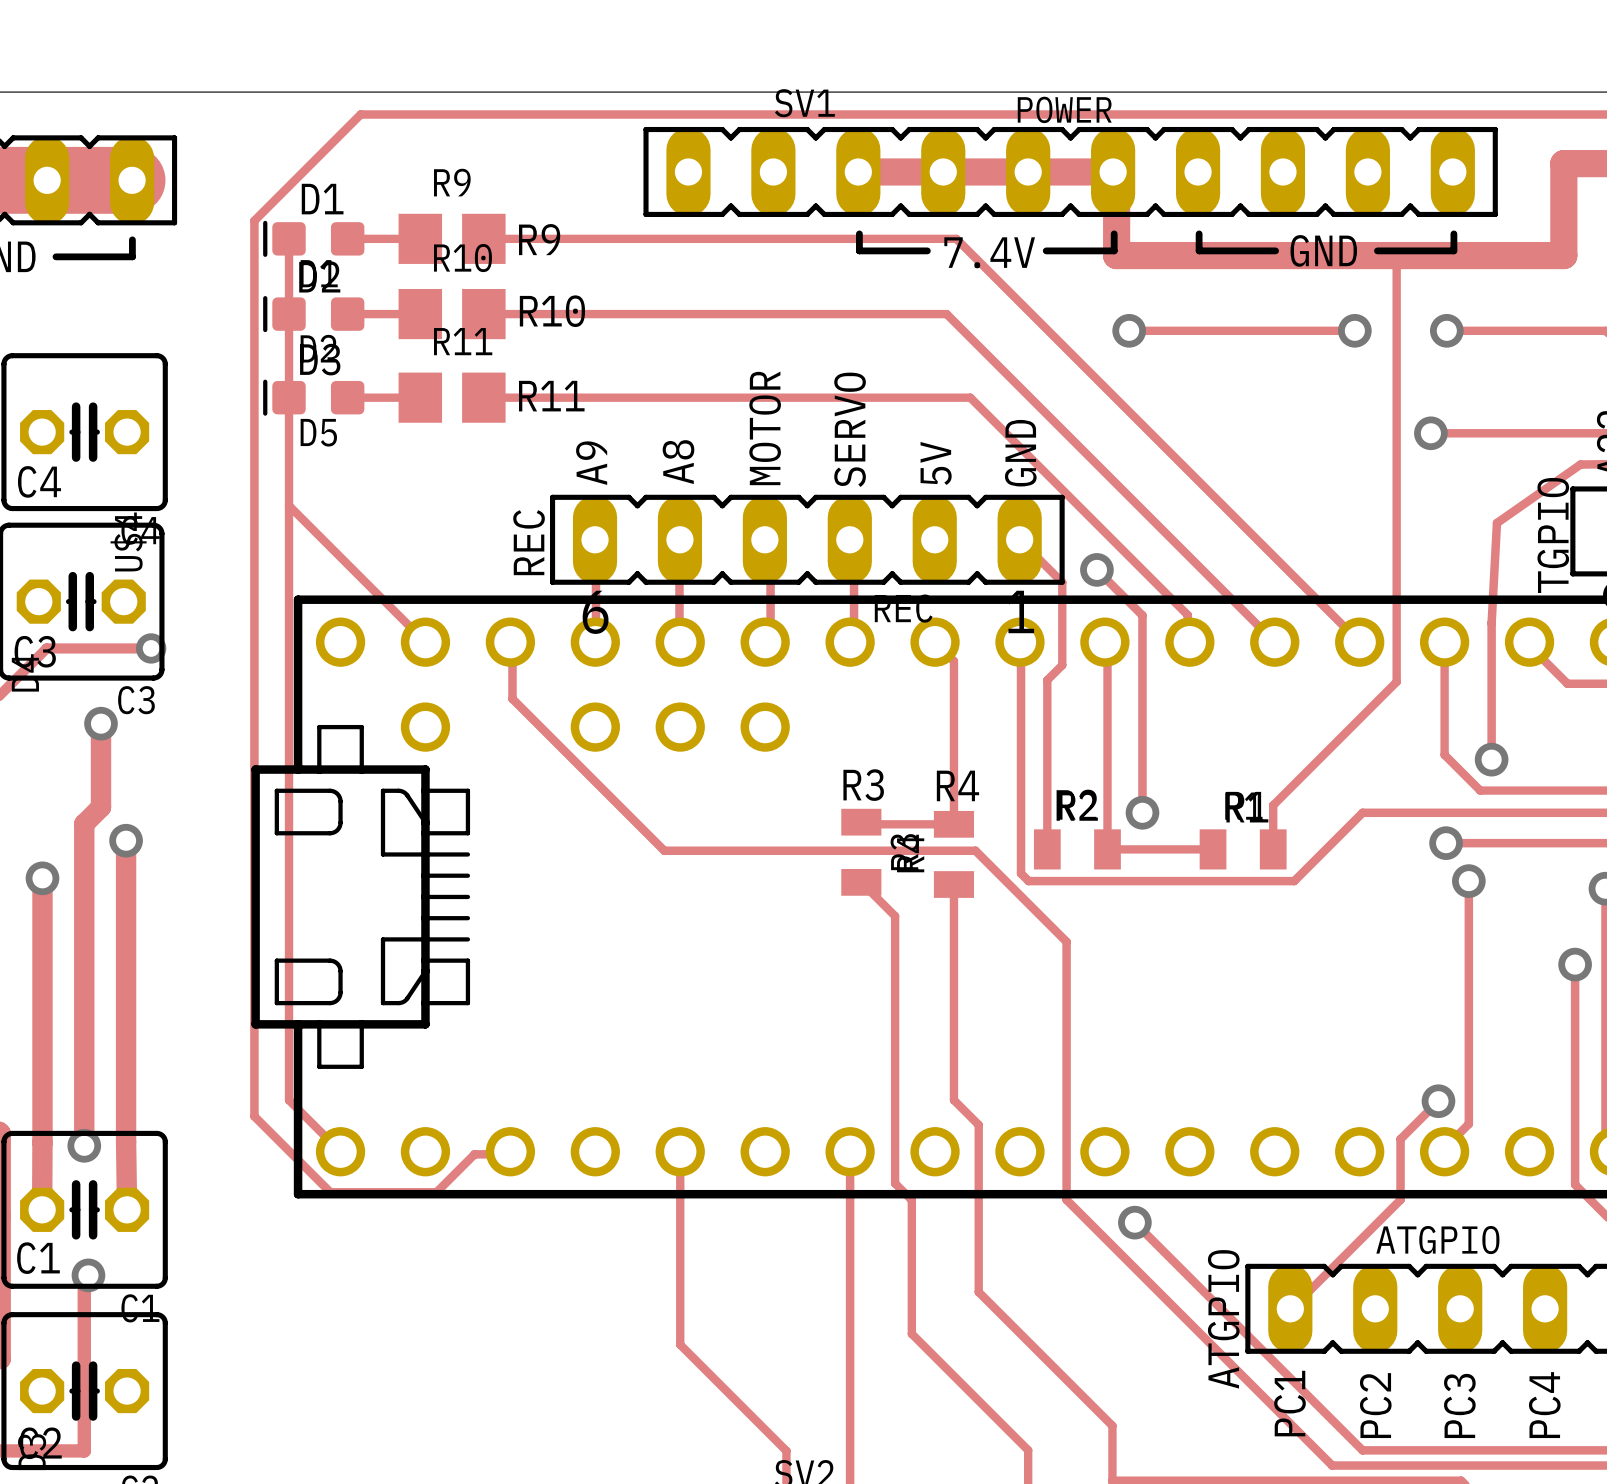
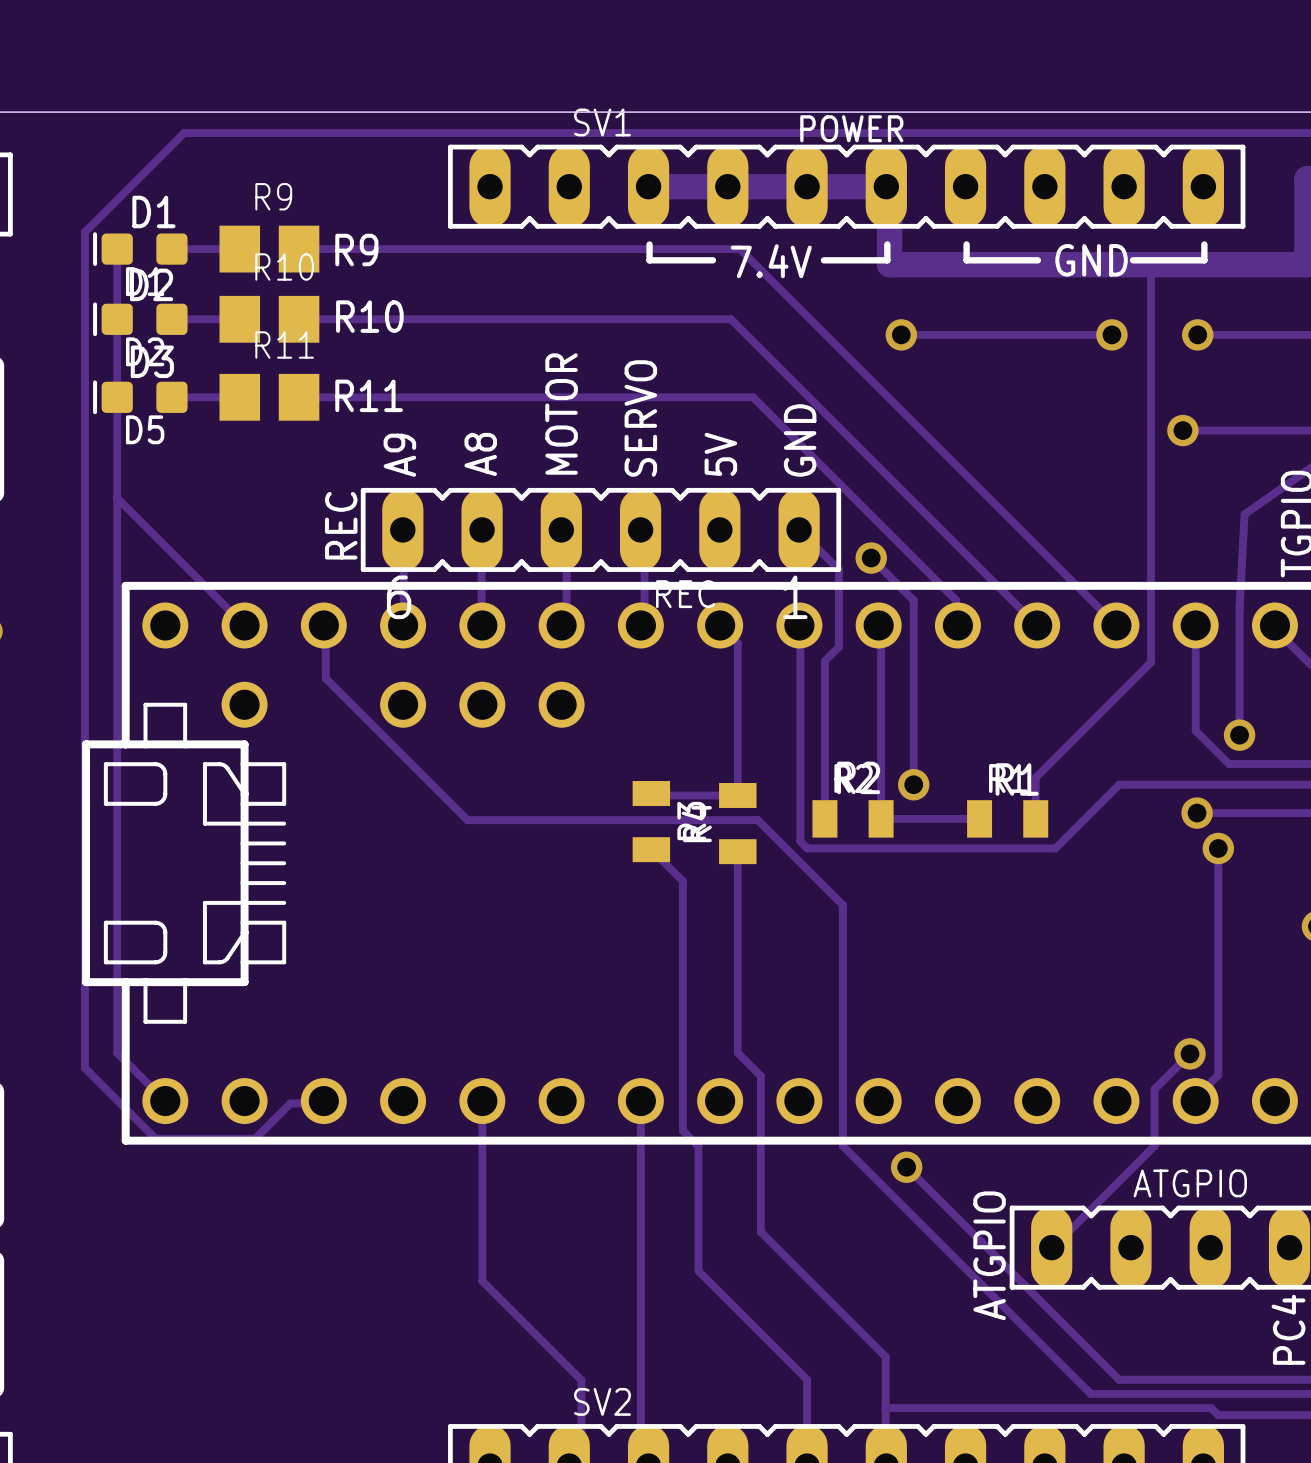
text: R3 (863, 785) -> none
text: R4 (957, 785) -> none
text: PC1 (1289, 1403) -> none
text: PC2 (1375, 1405) -> none
text: PC3 (1459, 1405) -> none

